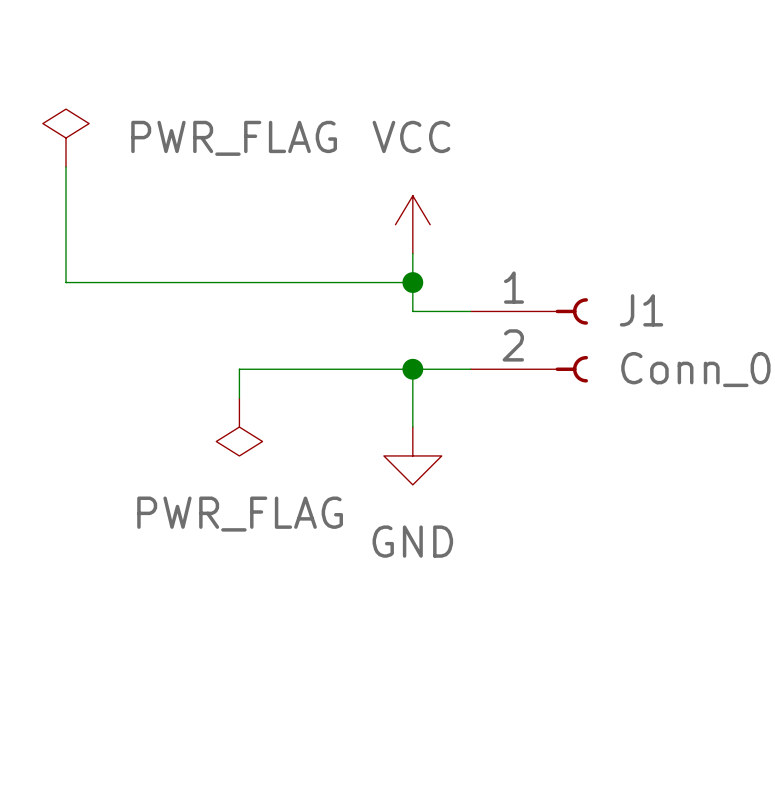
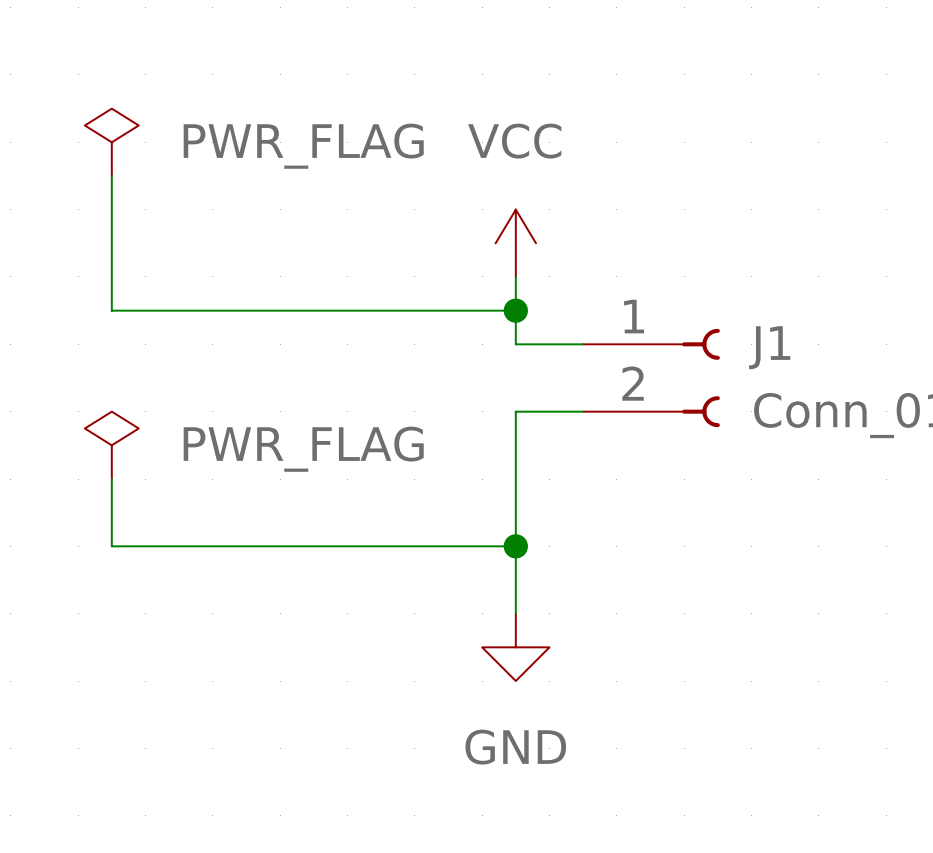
wire: (412, 369) (239, 369) (239, 398) -> none
junction position: (412, 369) -> (515, 546)
wire: none -> (111, 479) (111, 546) (515, 546)
power symbol rotation: 0° (239, 427) -> 180° (111, 445)
power symbol position: PWR_FLAG (239, 427) -> PWR_FLAG (111, 445)
wire: none -> (515, 479) (515, 613)
power symbol position: GND (412, 455) -> GND (515, 647)
power symbol text position: PWR_FLAG (240, 514) -> PWR_FLAG (303, 449)

